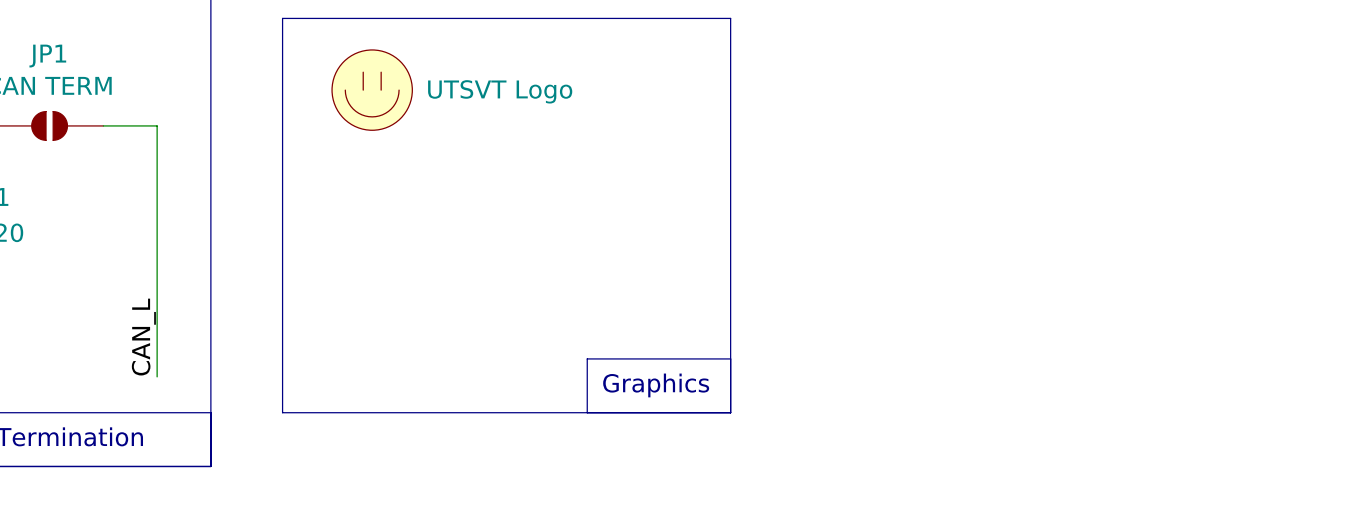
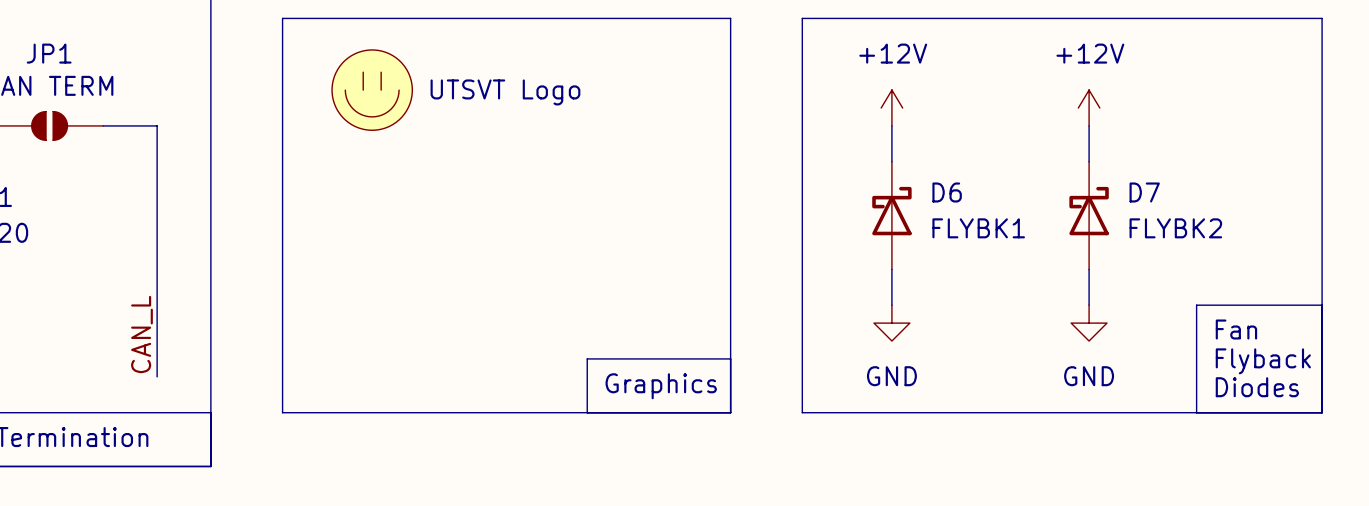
line: none -> (802, 18) (1322, 18) (1322, 412) (802, 412) (802, 18)
power symbol: none -> +12V (891, 108)
power symbol: none -> +12V (1089, 108)
wire: none -> (891, 125) (891, 161)
wire: none -> (1089, 125) (1089, 161)
D6: none -> FLYBK1 (891, 215)
D7: none -> FLYBK2 (1089, 215)
wire: none -> (891, 269) (891, 305)
wire: none -> (1089, 269) (1089, 305)
line: none -> (1322, 305) (1196, 305) (1196, 412)
power symbol: none -> GND (891, 323)
power symbol: none -> GND (1089, 323)
text: none -> Fan (1236, 329)
text: none -> Flyback (1263, 361)
text: none -> Diodes (1257, 387)

